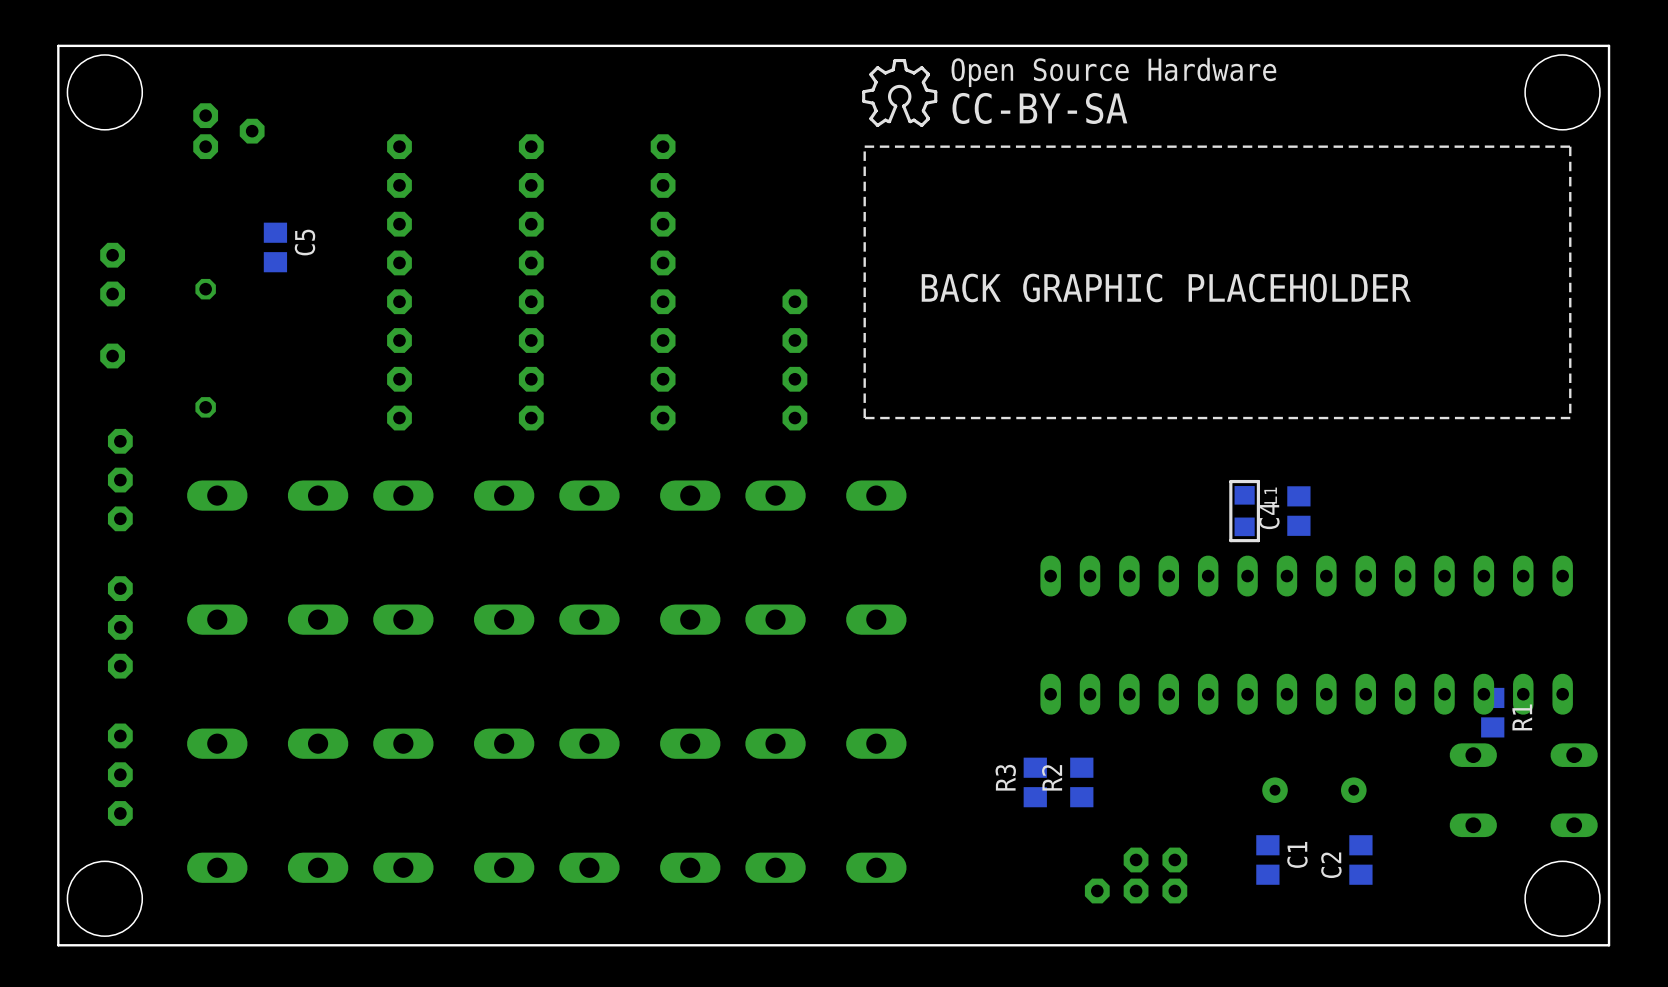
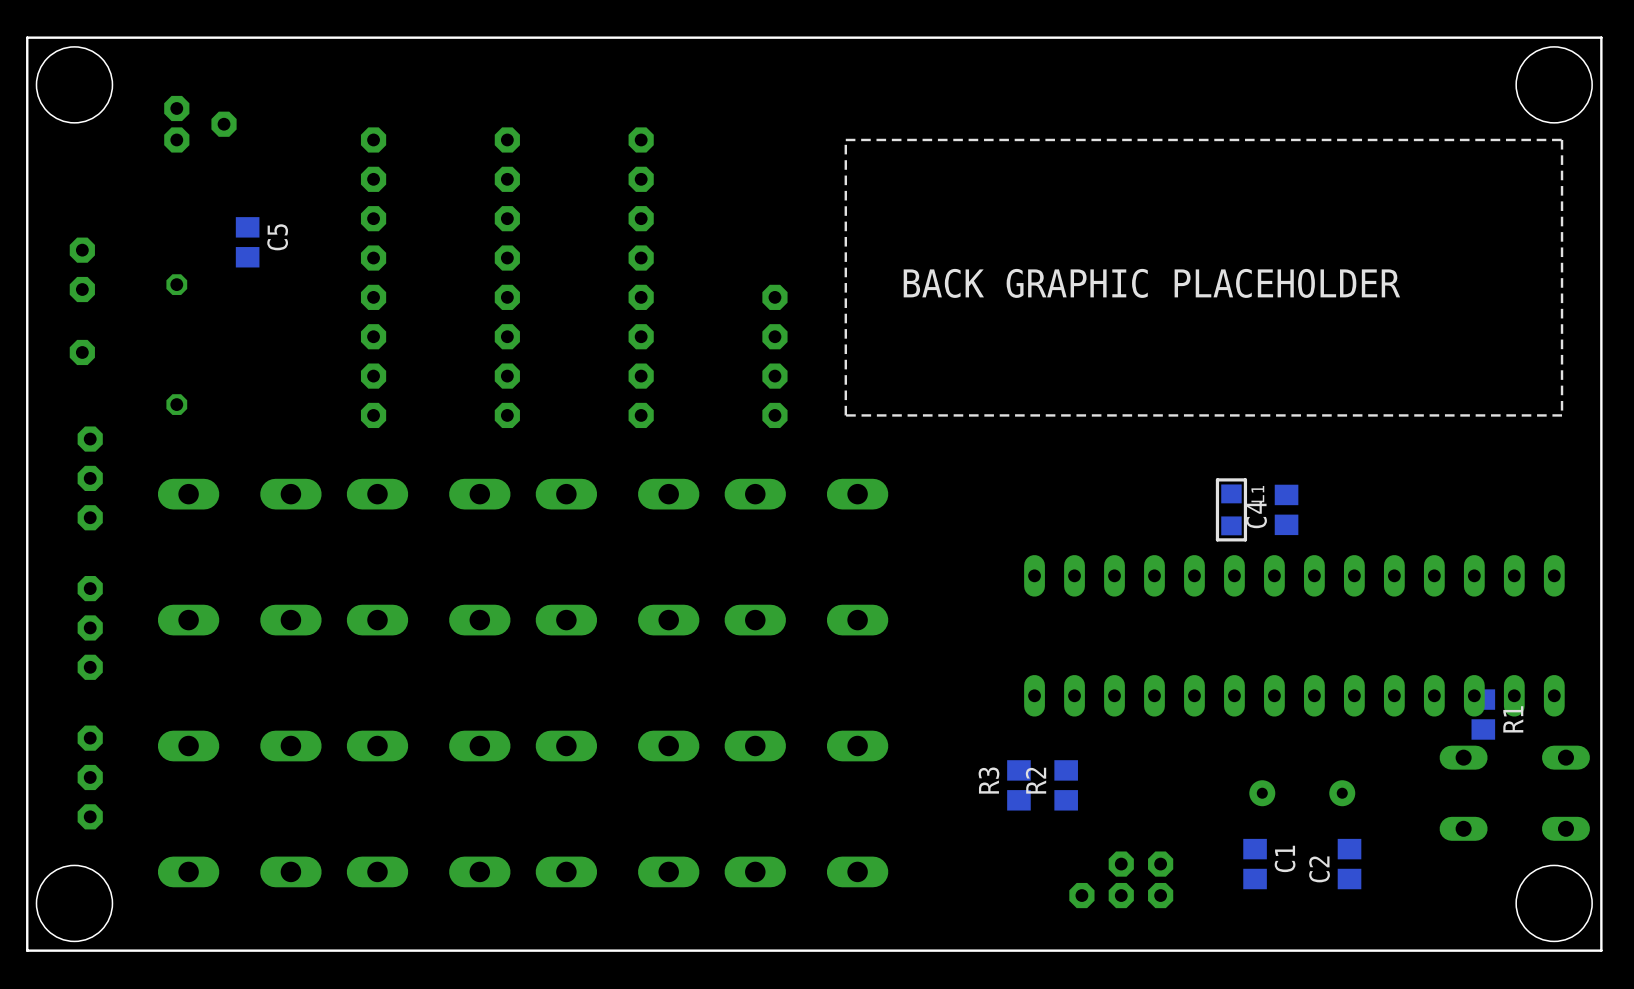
line: (904, 60) (895, 60) (893, 69) (885, 72) (877, 67) (870, 74) (876, 82) (873, 89) (863, 92) (863, 101) (872, 103) (876, 110) (870, 118) (877, 125) (885, 120) (889, 121) (895, 106) (890, 101) (889, 95) (895, 87) (903, 87) (909, 92) (909, 100) (903, 106) (910, 121) (914, 120) (922, 125) (928, 118) (923, 110) (926, 103) (935, 101) (935, 91) (926, 89) (923, 82) (928, 74) (921, 67) (913, 72) (906, 69) (904, 60) -> none
text: Open Source Hardware (1113, 72) -> none
text: CC-BY-SA (1039, 108) -> none

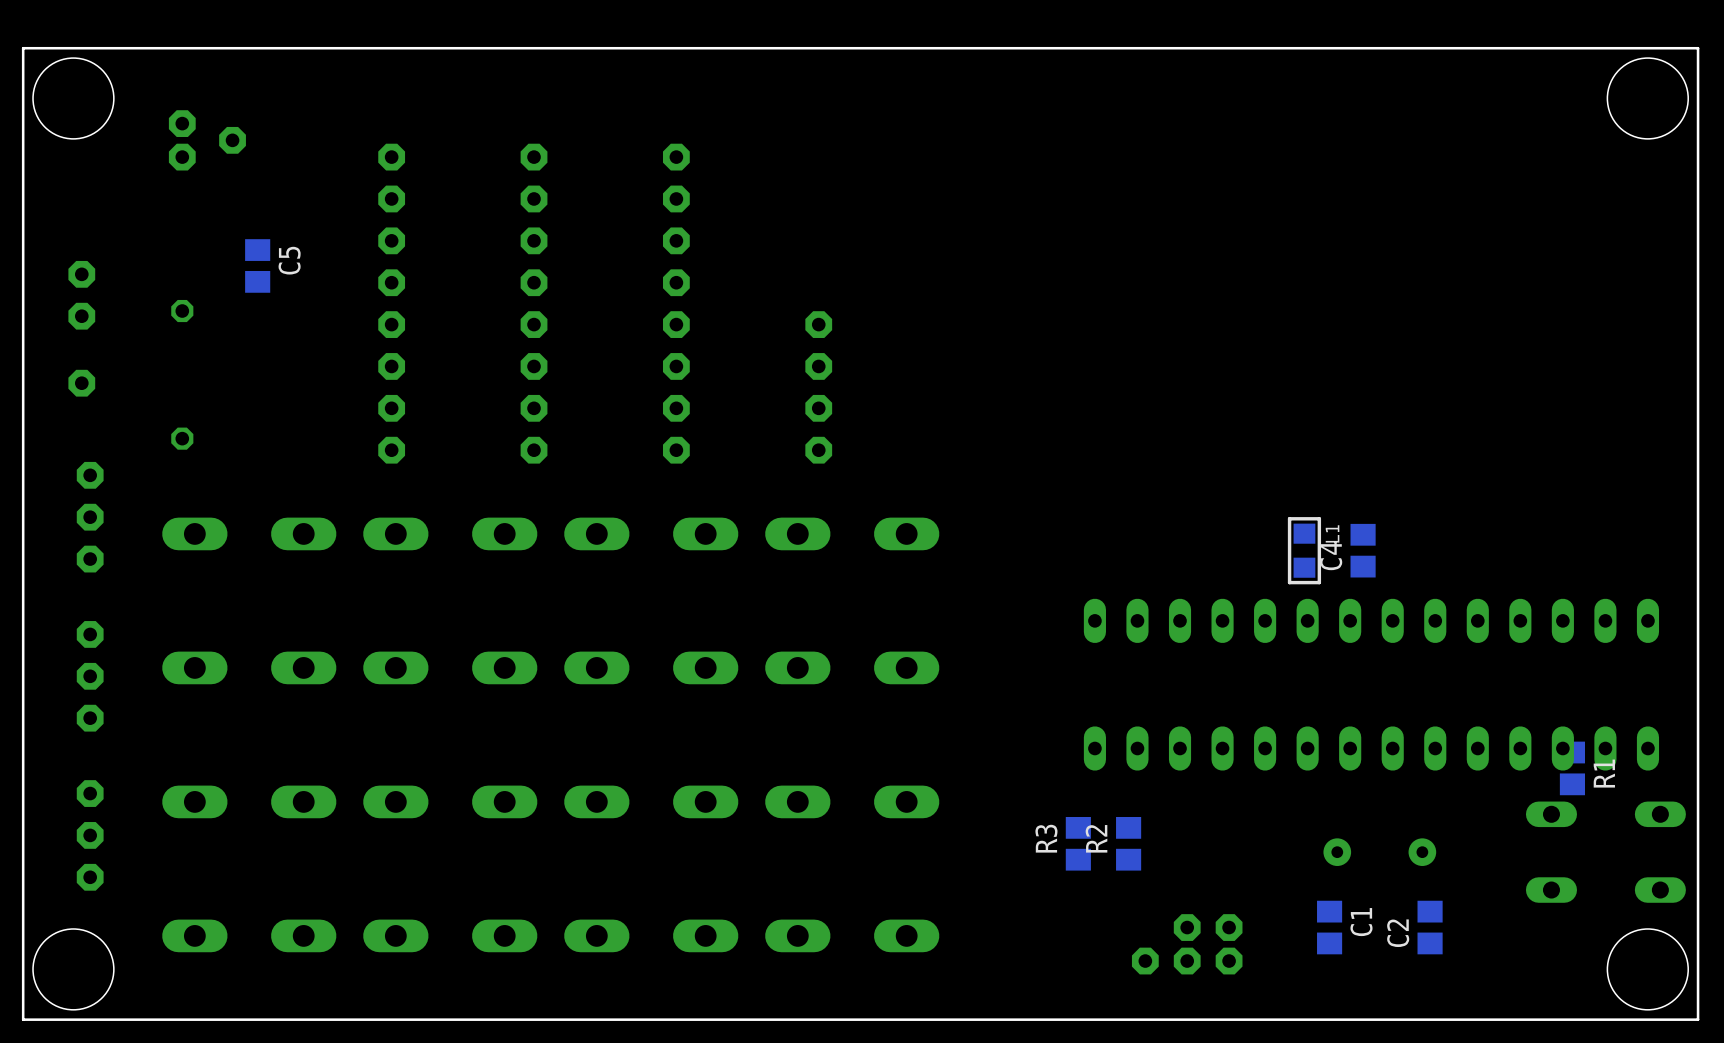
line: (1562, 139) (845, 139) (845, 415) (1562, 415) (1562, 139) -> none
text: BACK GRAPHIC PLACEHOLDER (1151, 283) -> none

